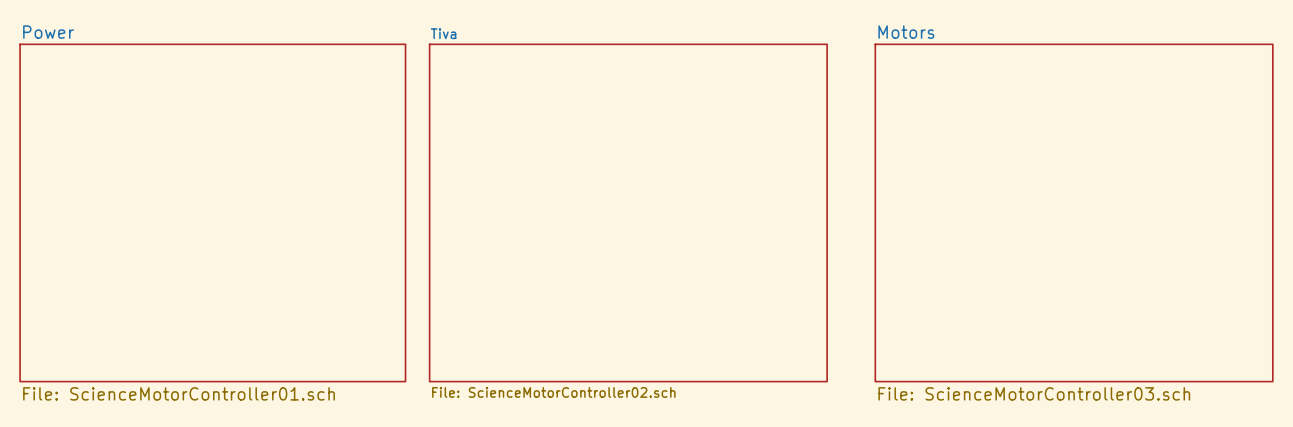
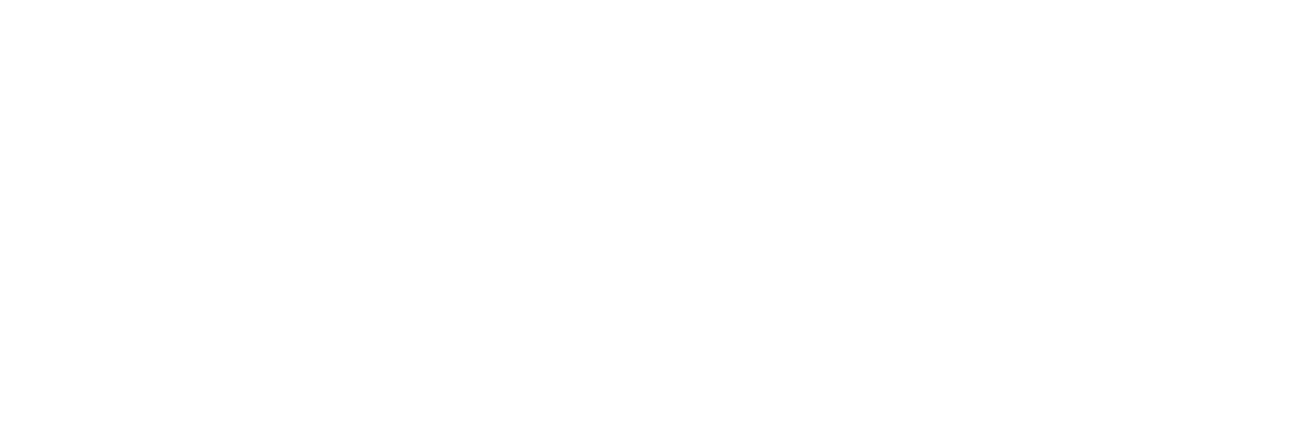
sheet Power: File: ScienceMotorController01.sch (212, 212) -> none
sheet Tiva: File: ScienceMotorController02.sch (628, 212) -> none
sheet Motors: File: ScienceMotorController03.sch (1074, 212) -> none

